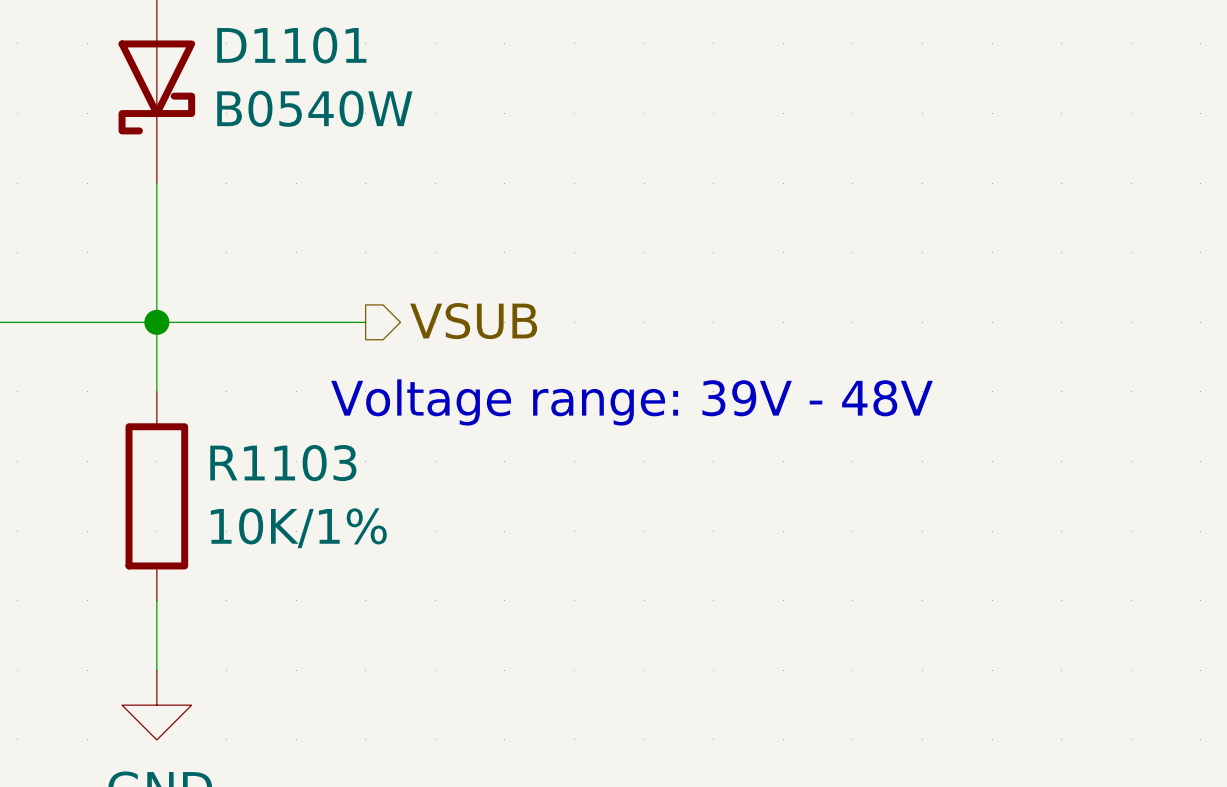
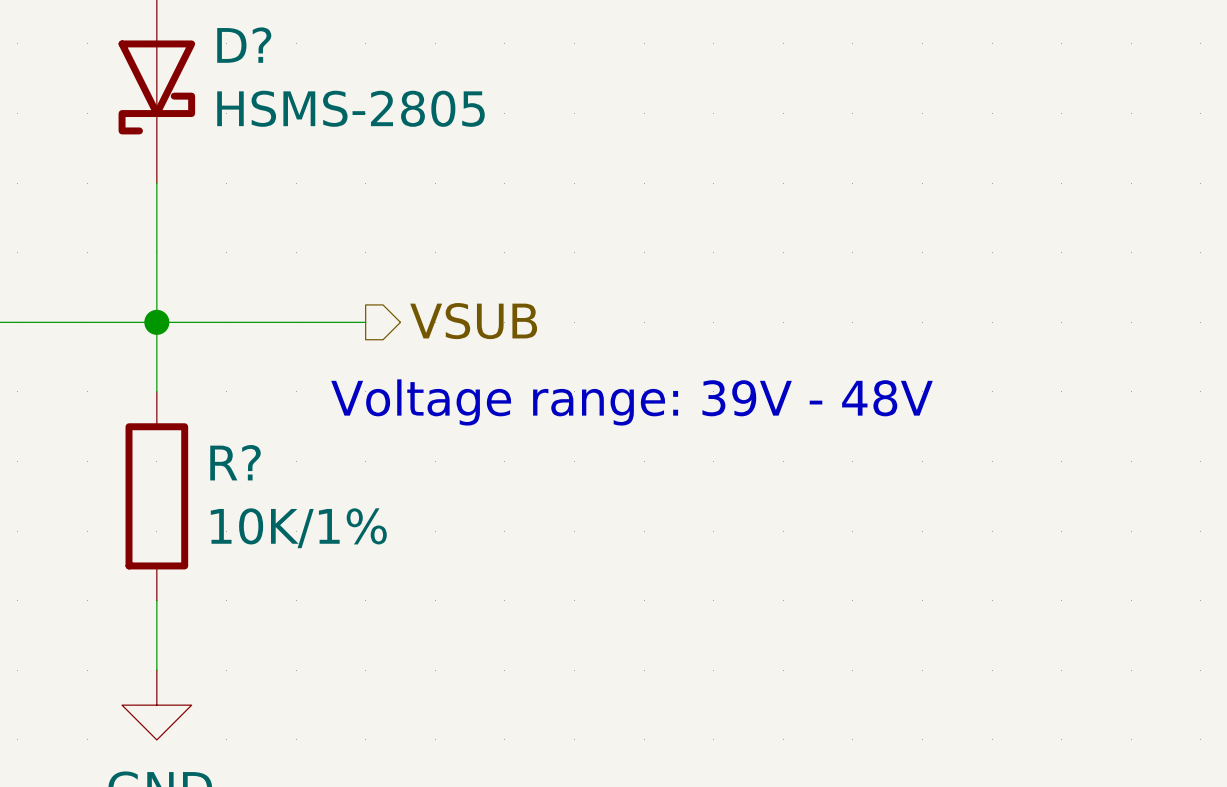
D1101 name: D1101 (291, 45) -> D? (244, 45)
D1101 value: B0540W (314, 108) -> HSMS-2805 (350, 108)
R1103 name: R1103 (283, 463) -> R? (235, 462)

